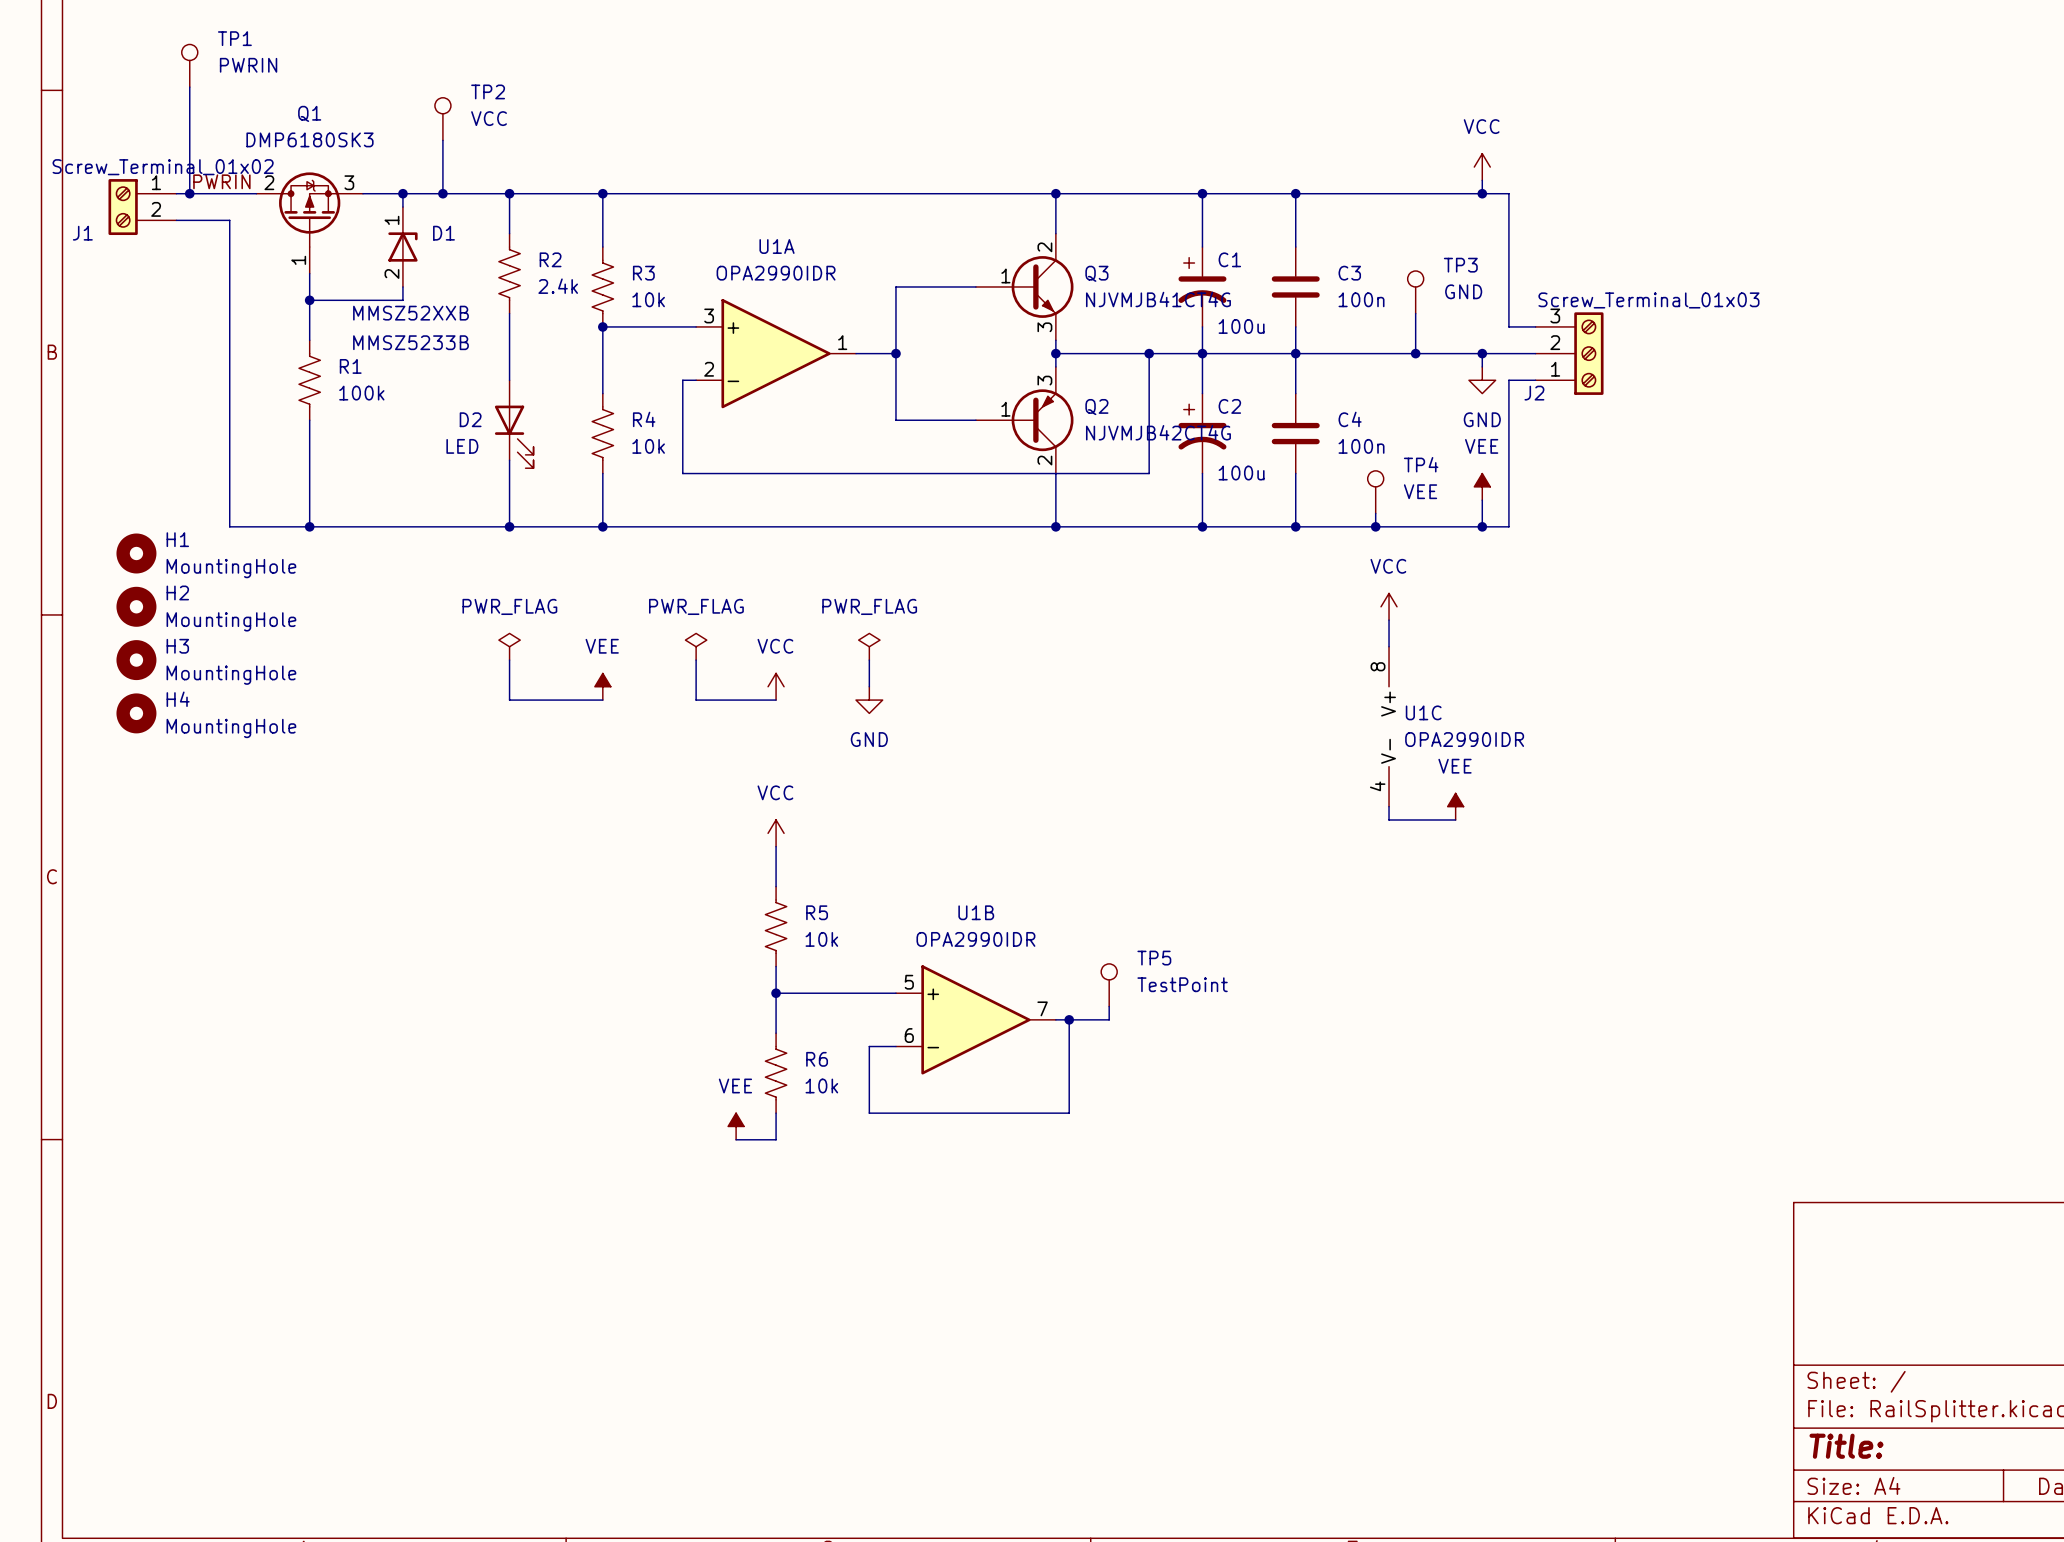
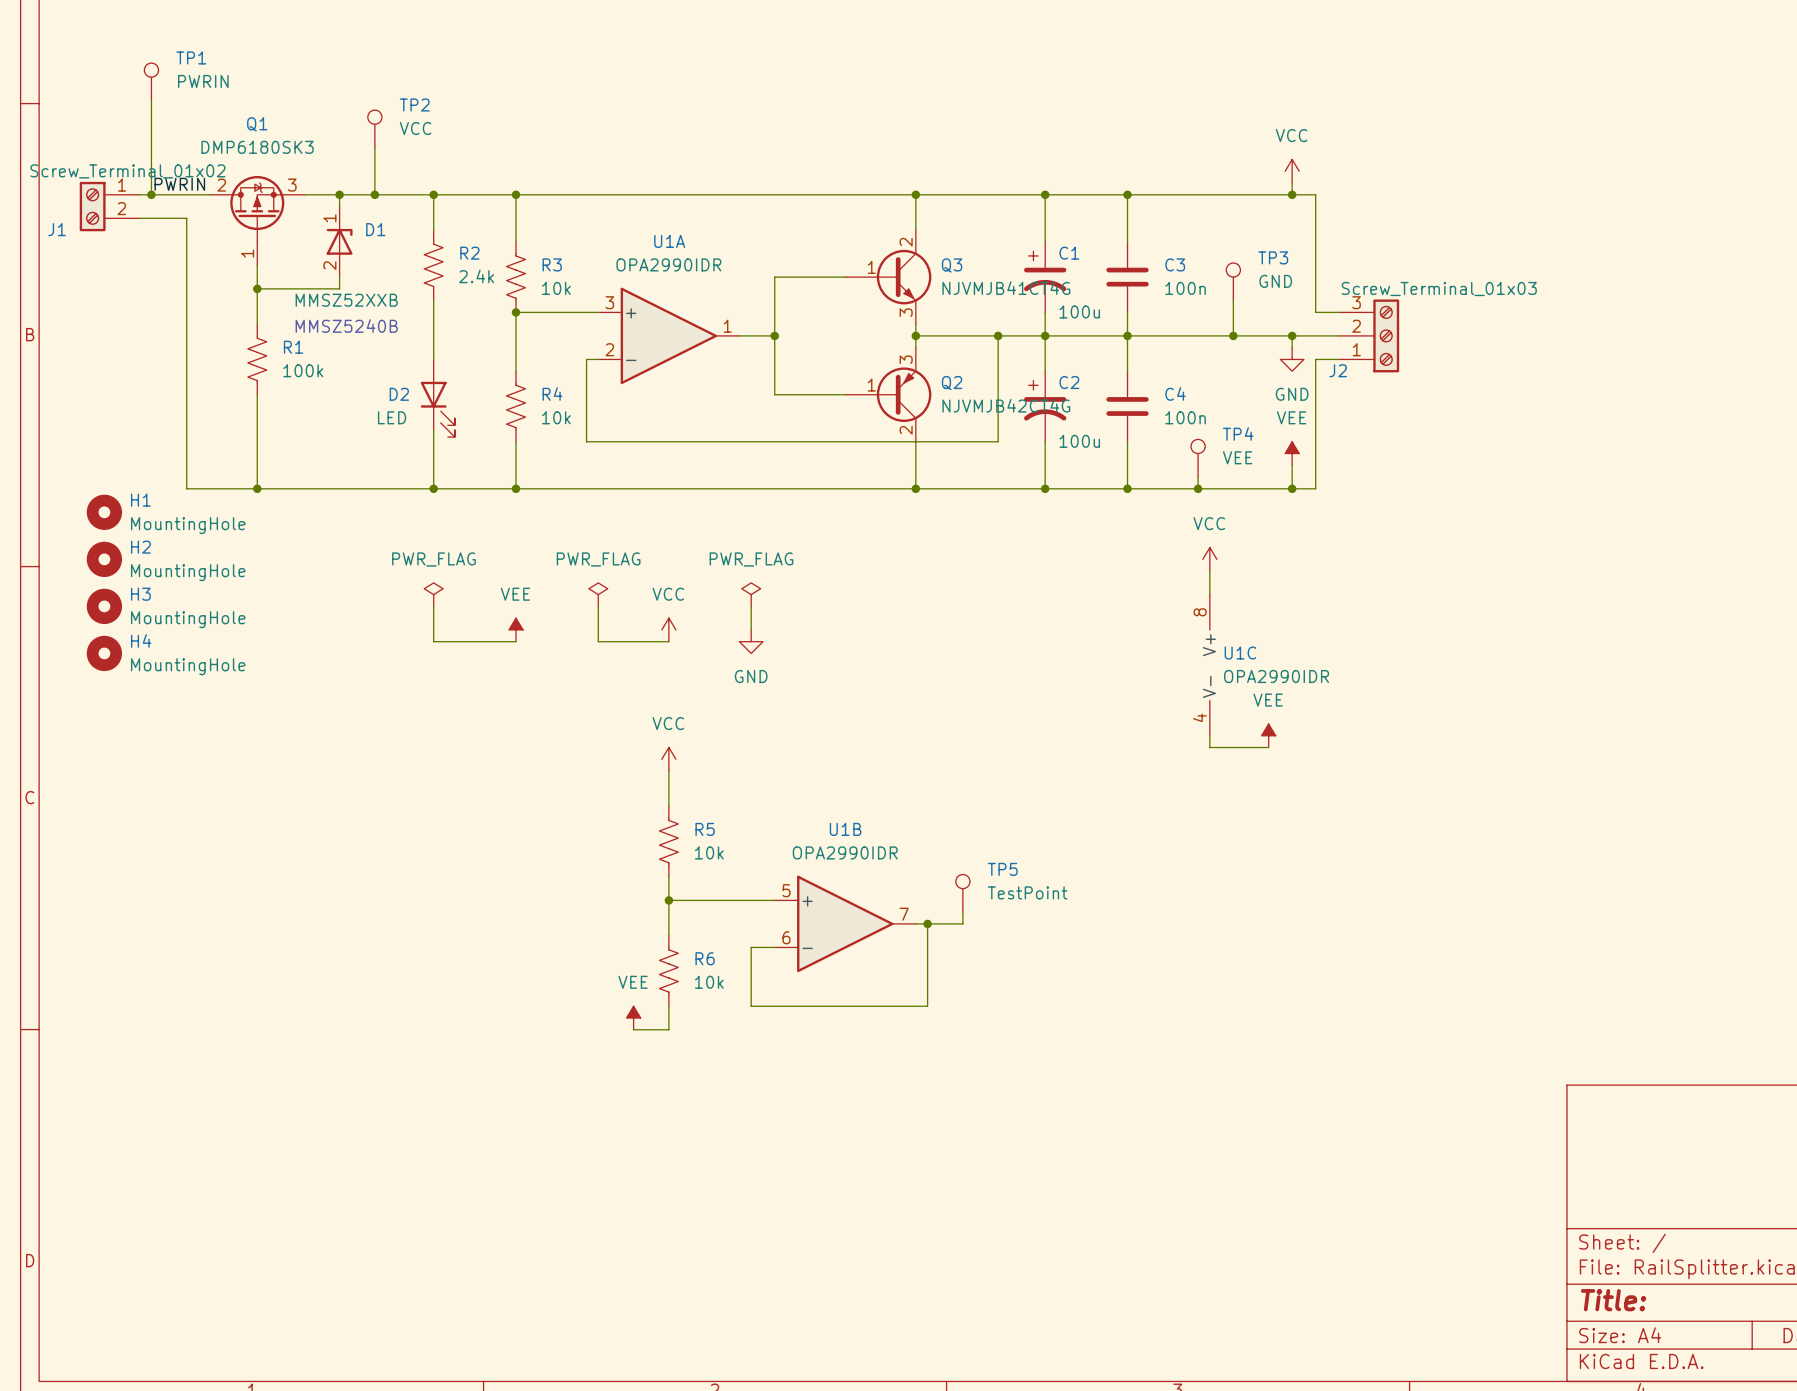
text: MMSZ5233B (410, 342) -> MMSZ5240B (346, 326)

